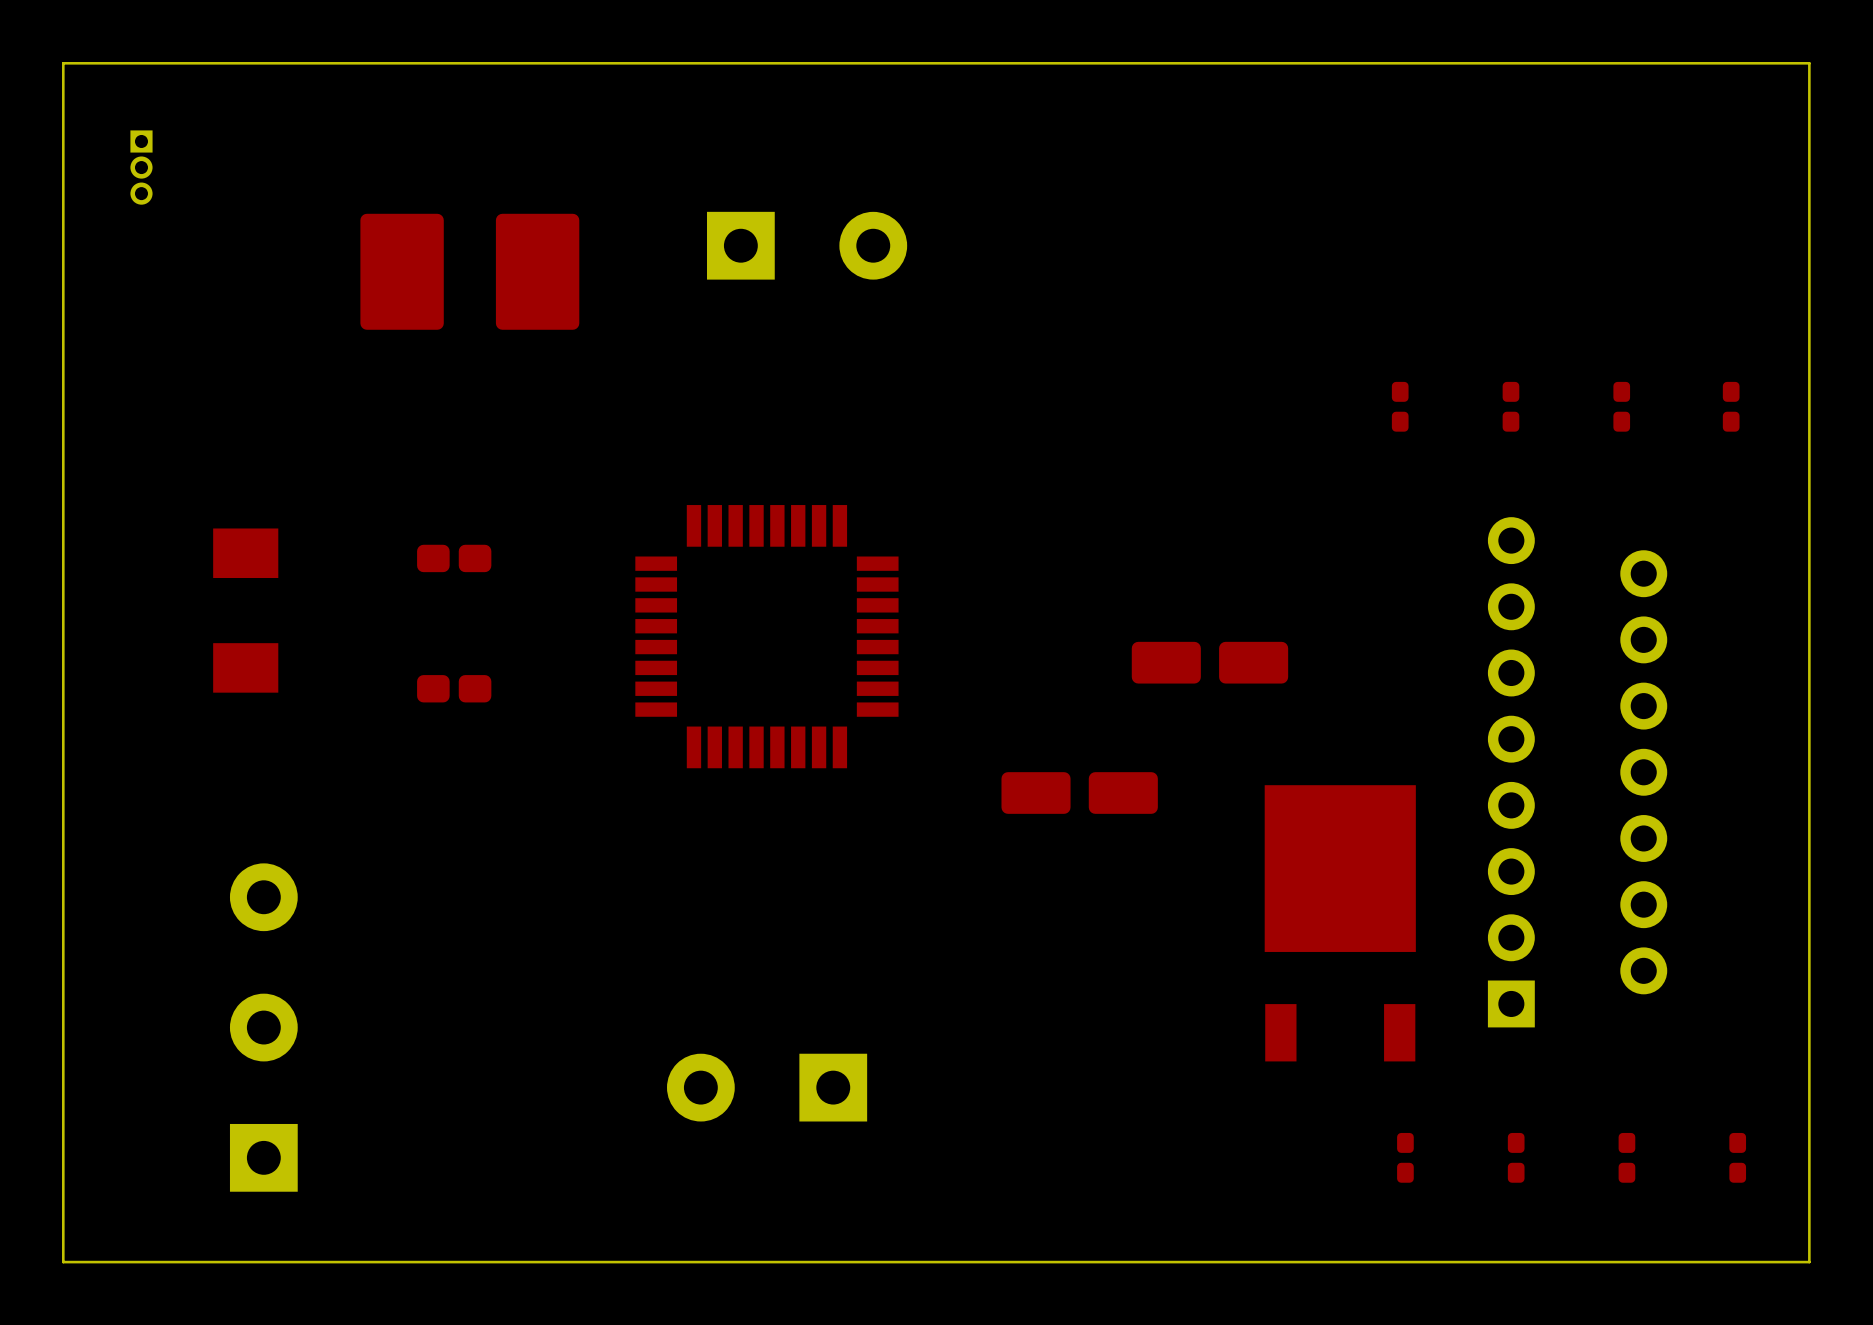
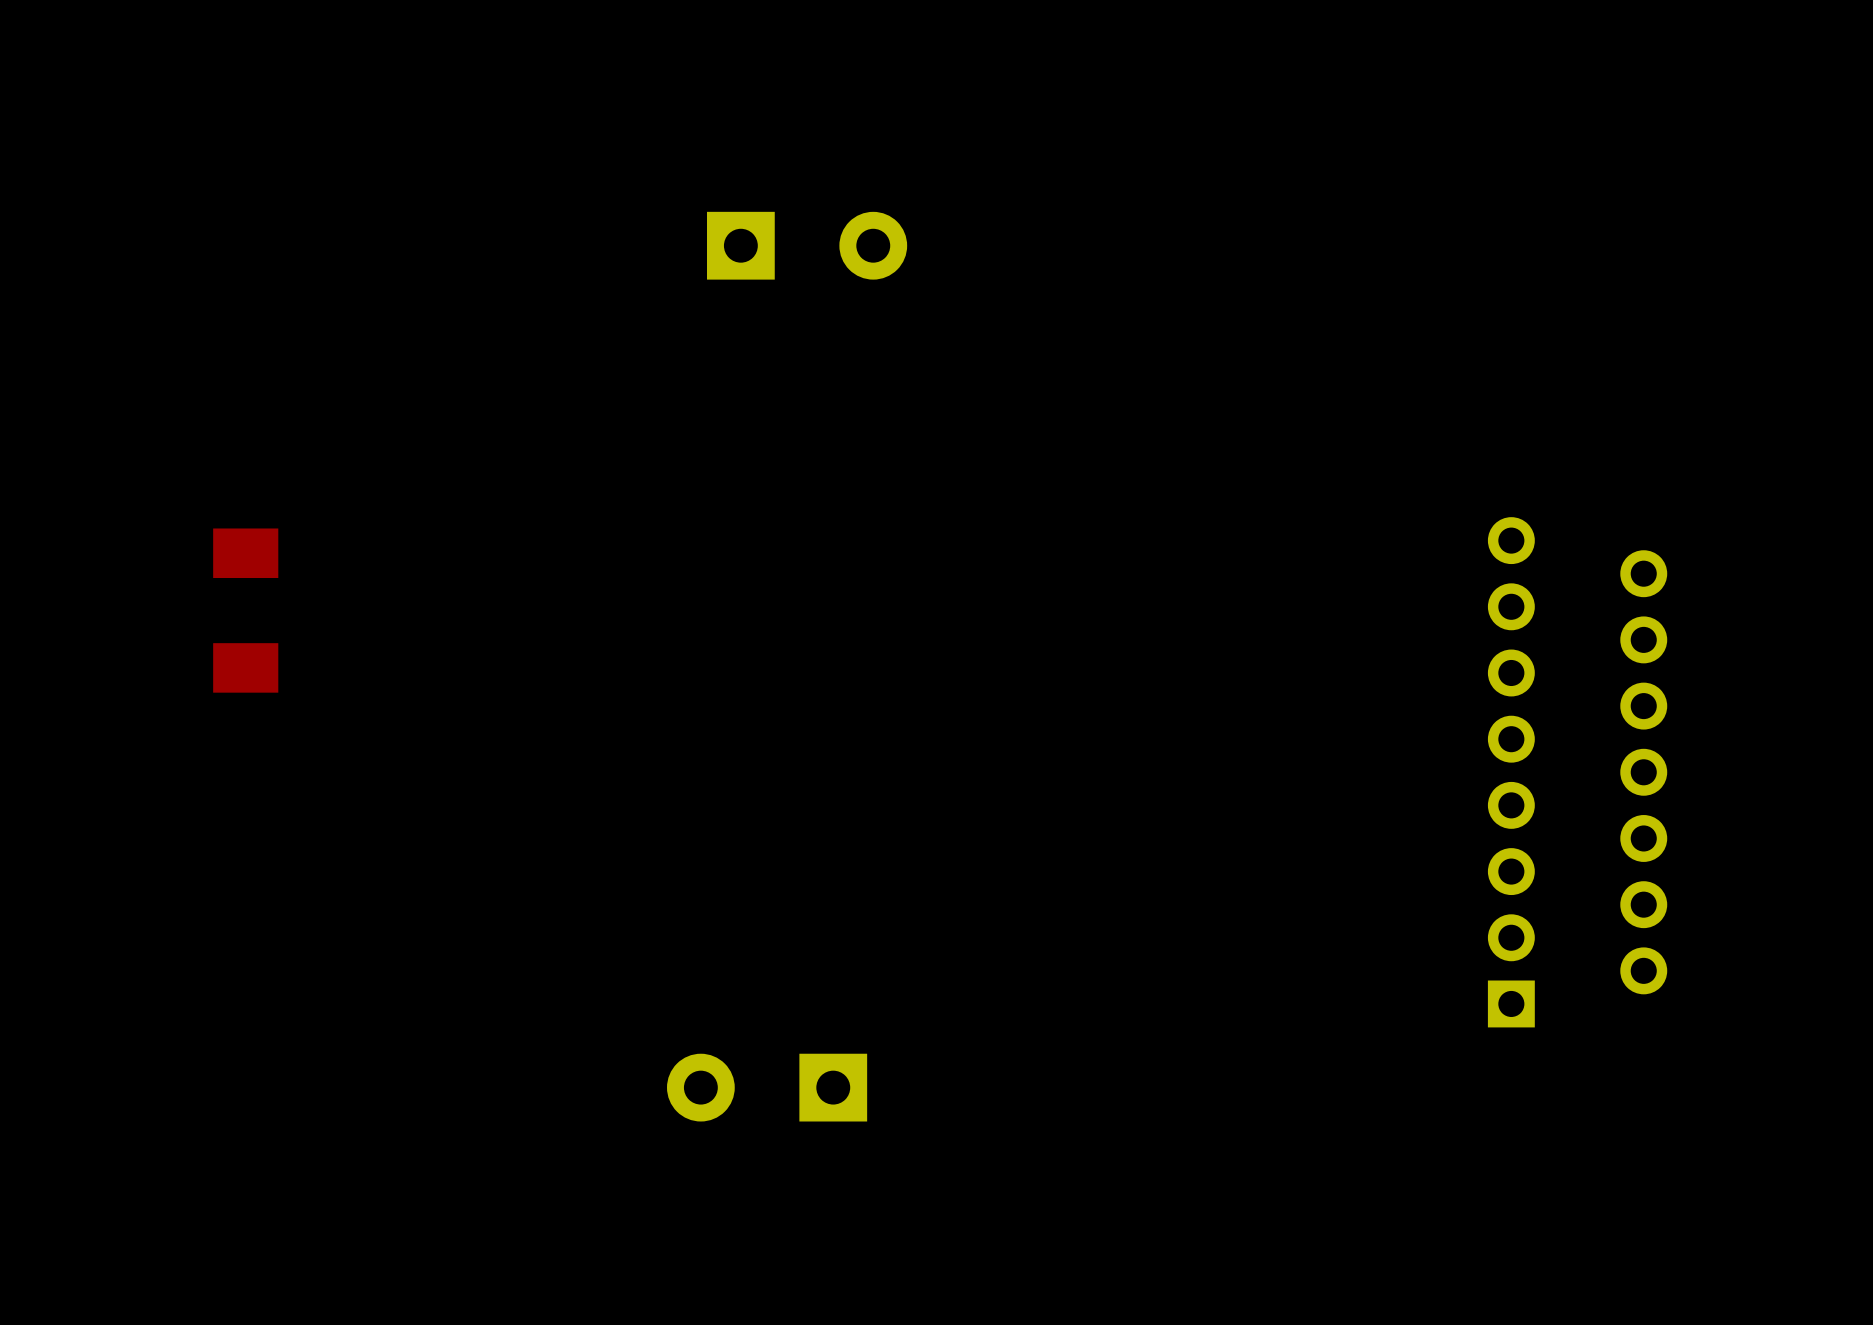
board edge: (1809, 63) (63, 63) (63, 1262) (1809, 1262) (1809, 63) -> none
part: (141, 167) -> none
part: (469, 271) -> none
part: (1400, 406) -> none
part: (1510, 406) -> none
part: (1621, 406) -> none
part: (1731, 406) -> none
part: (454, 558) -> none
part: (766, 636) -> none
part: (1209, 662) -> none
part: (454, 688) -> none
part: (1079, 793) -> none
part: (1340, 923) -> none
part: (263, 1027) -> none
part: (1405, 1157) -> none
part: (1516, 1157) -> none
part: (1626, 1157) -> none
part: (1737, 1157) -> none

